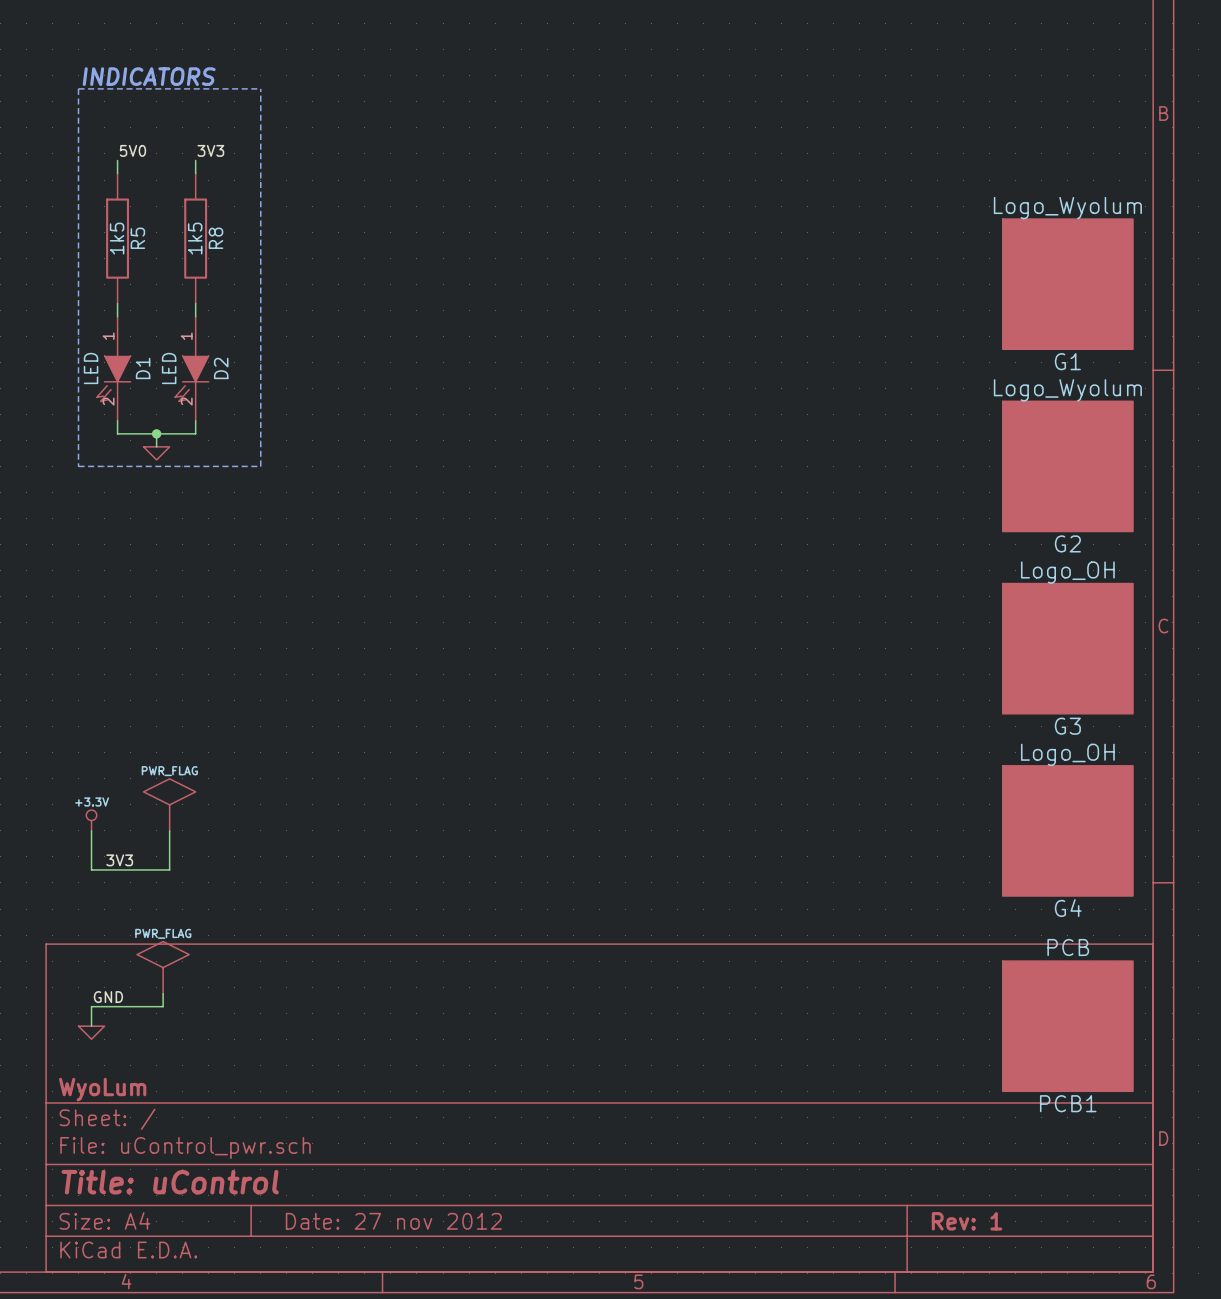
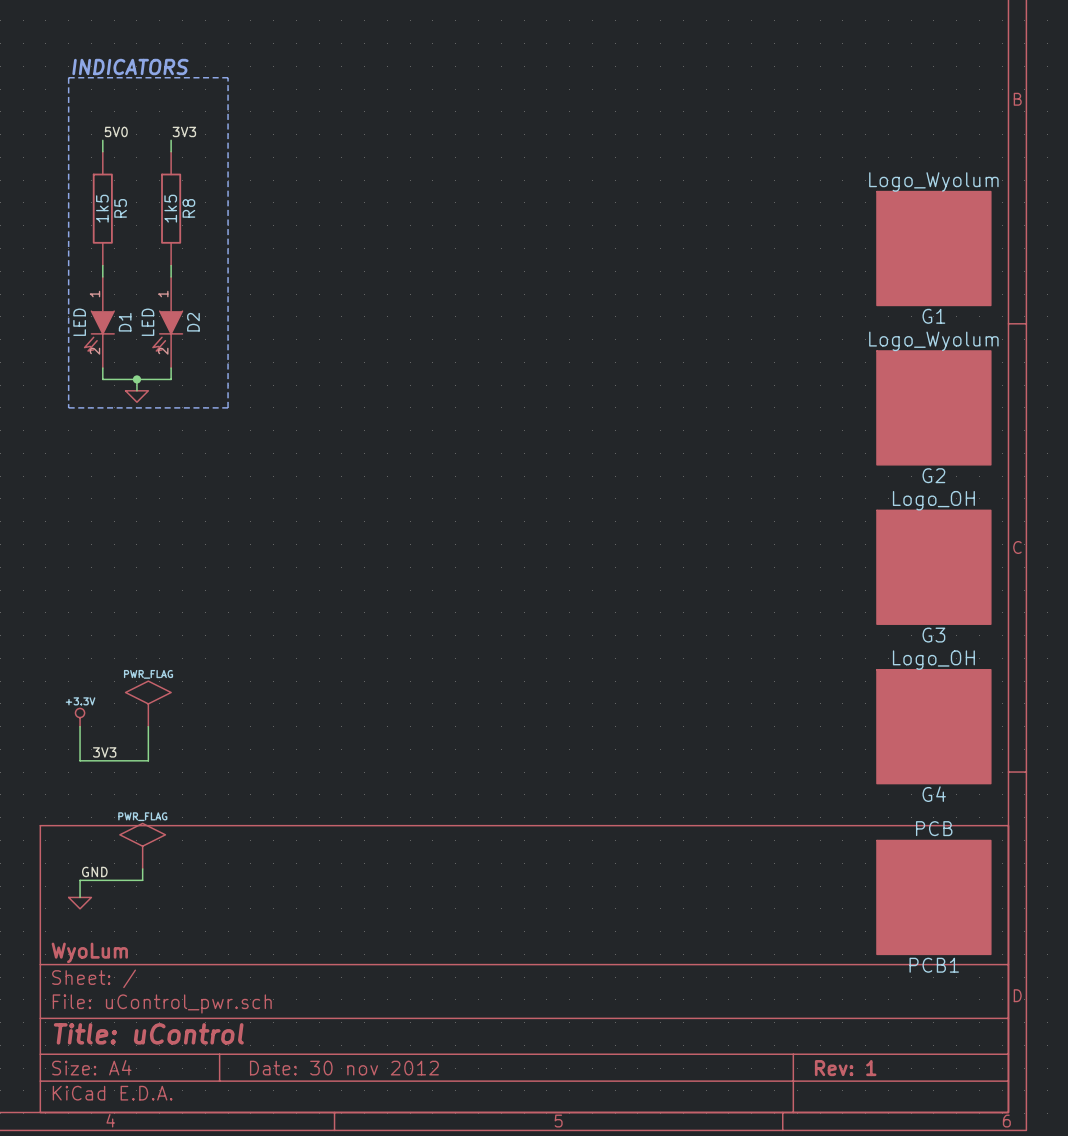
title block: Date: 27 nov 2012 (393, 1221) -> Date: 30 nov 2012 (344, 1068)

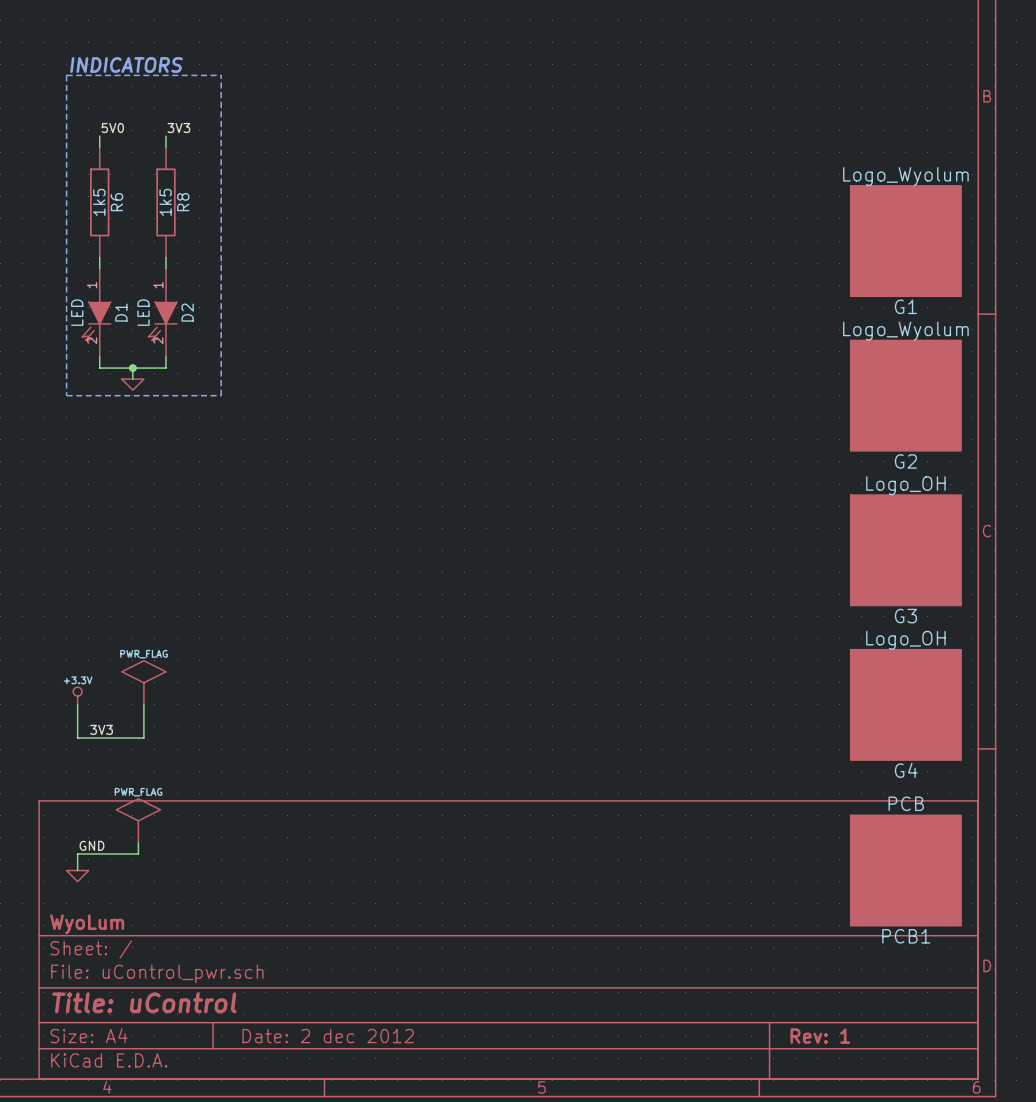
R5 name: R5 (120, 208) -> R6 (116, 202)
title block: Date: 30 nov 2012 (344, 1068) -> Date: 2 dec 2012 (328, 1036)

